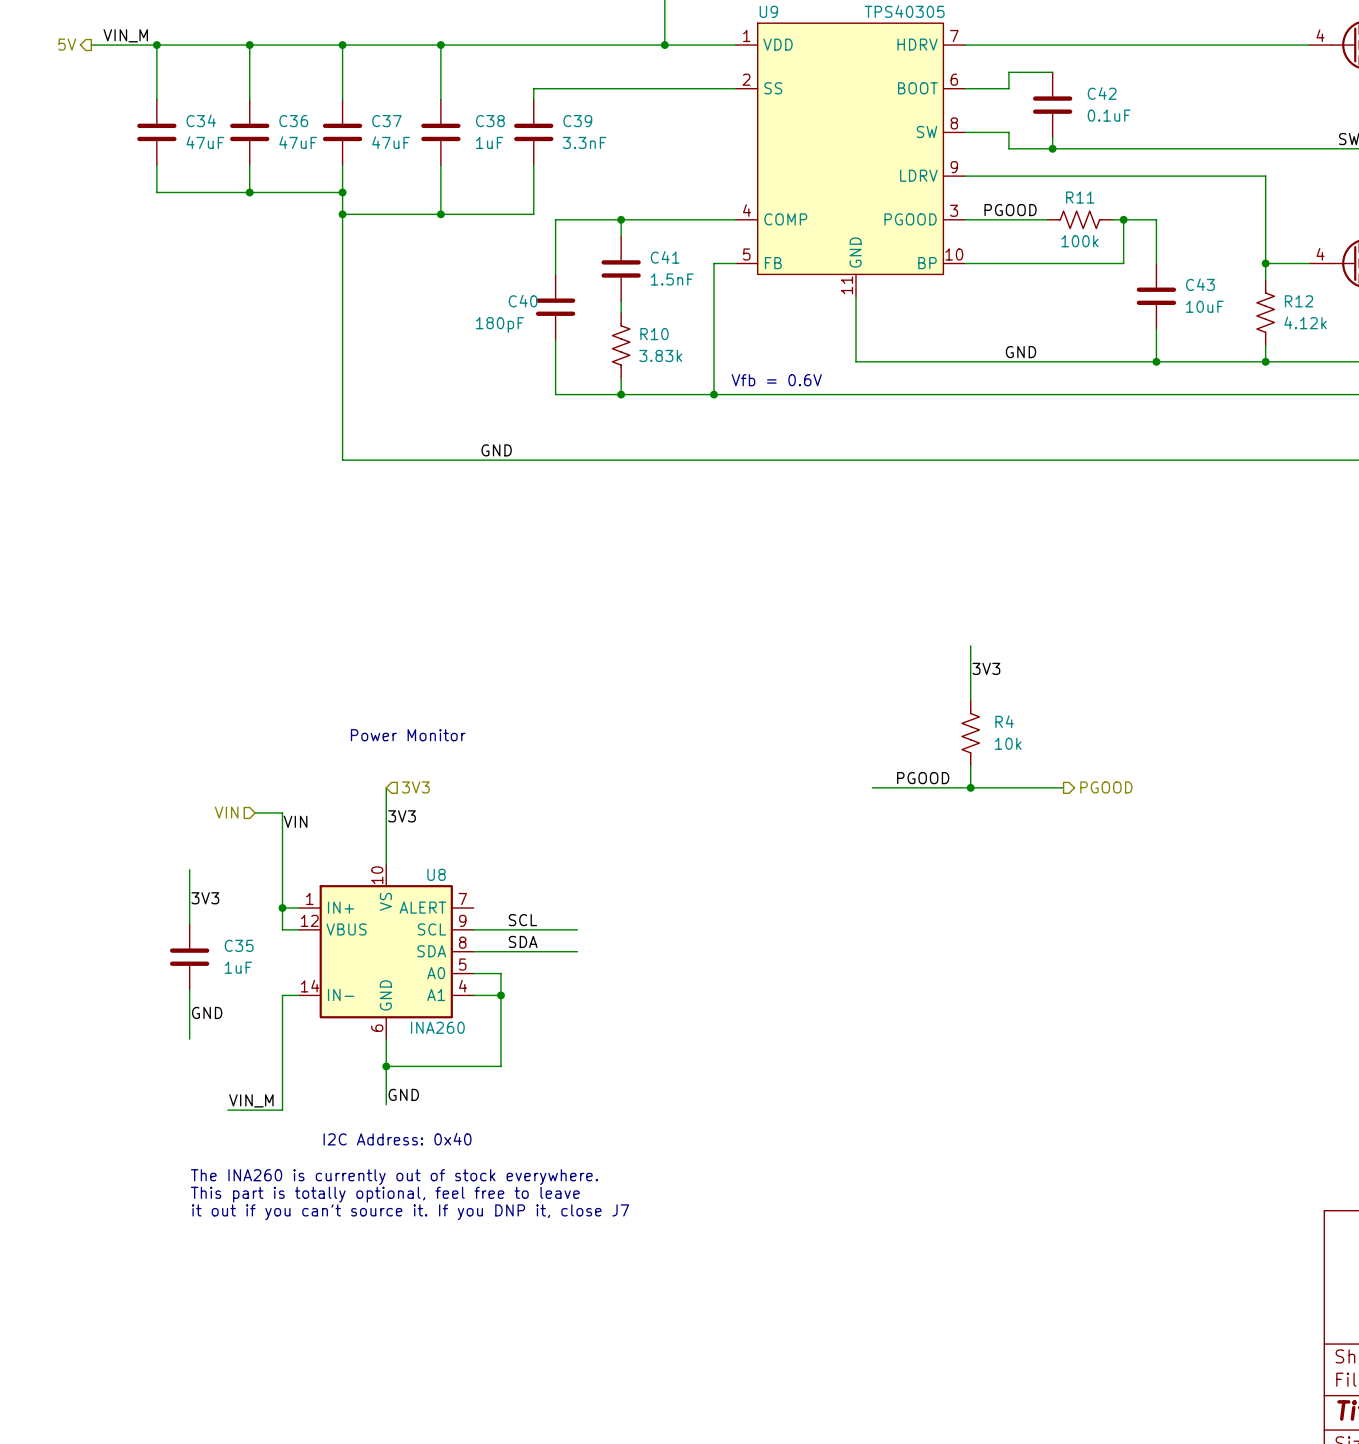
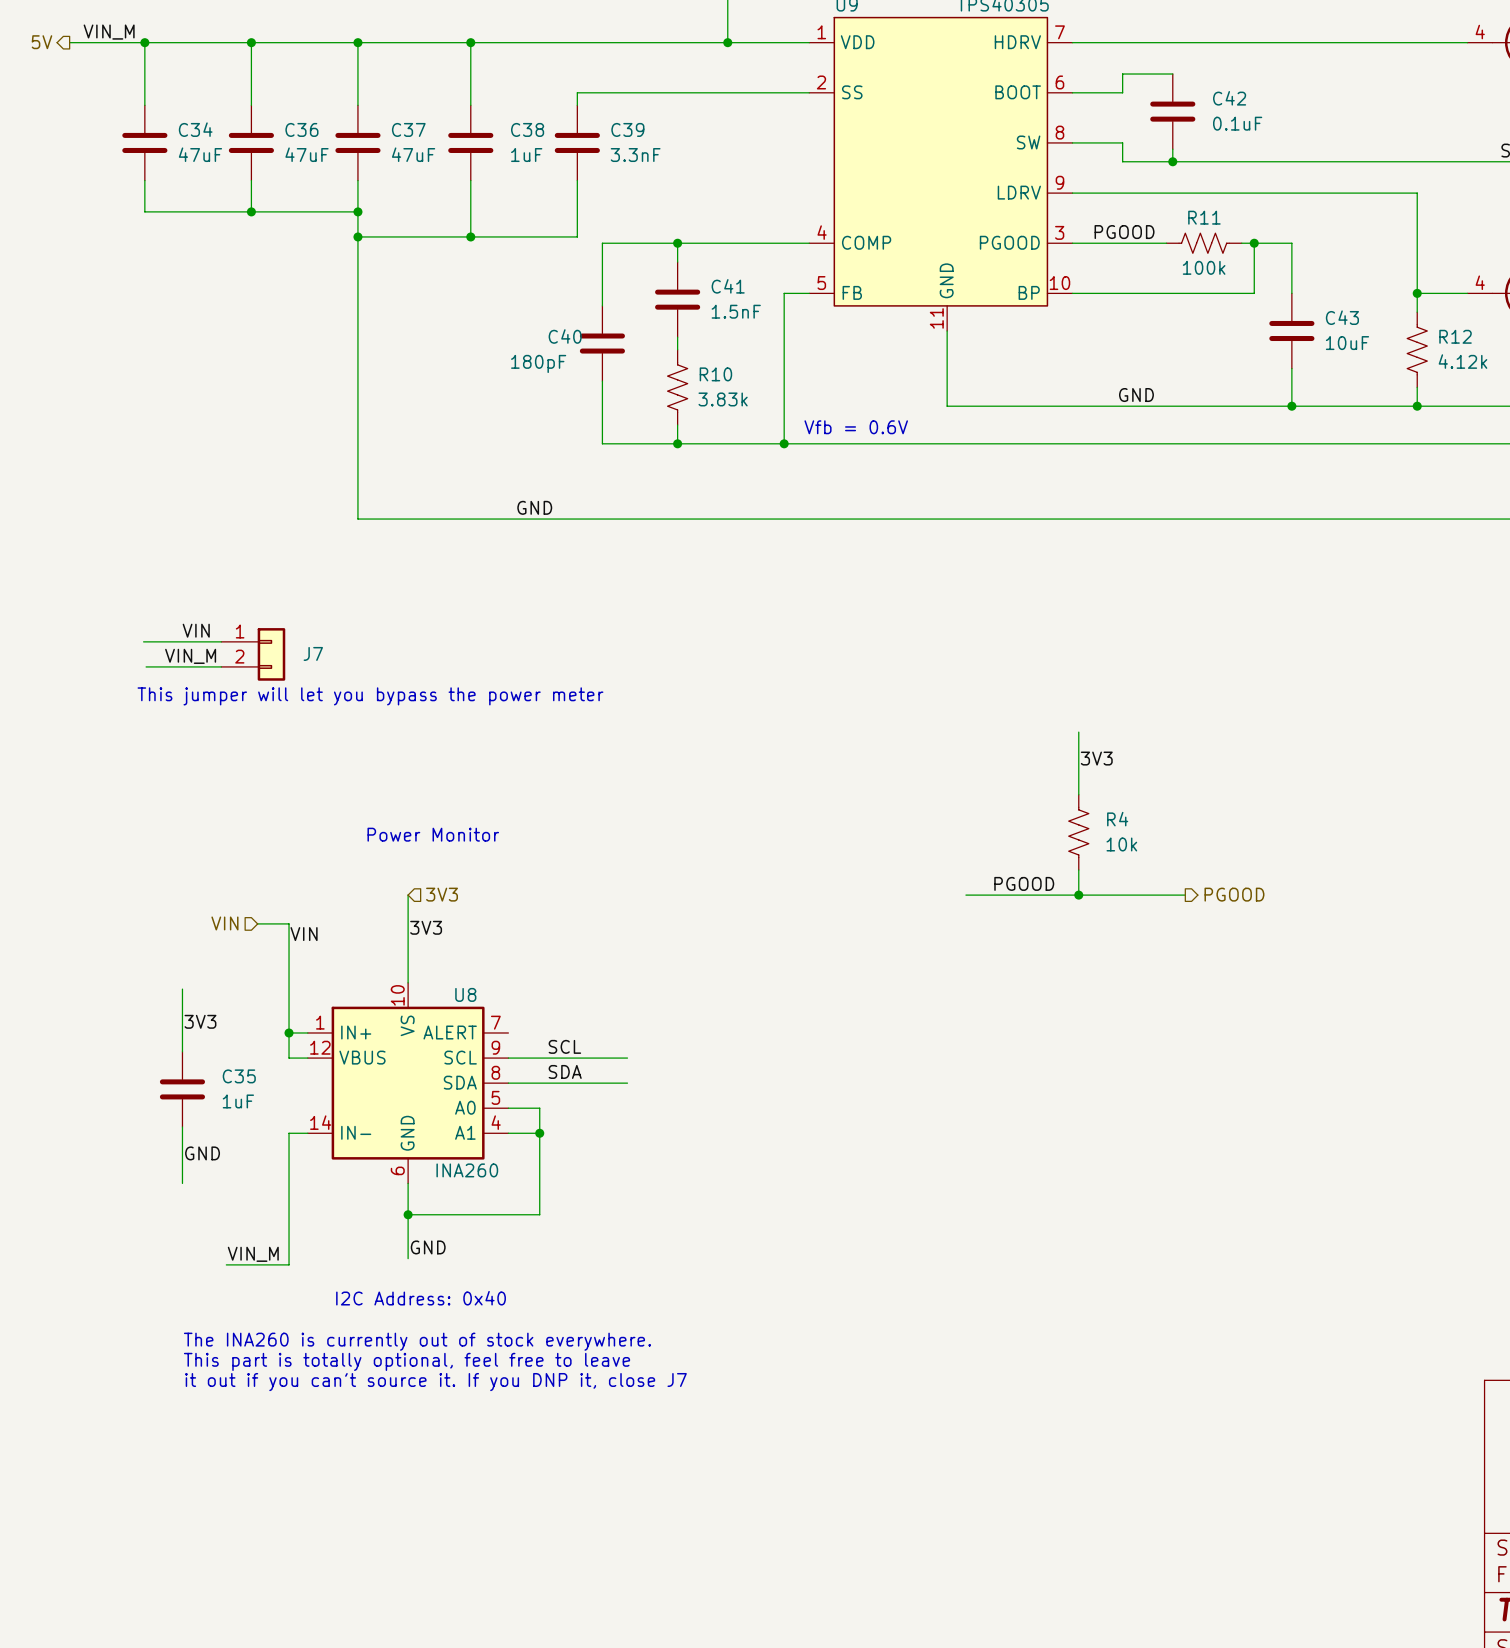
label: none -> VIN (196, 630)
wire: none -> (143, 641) (221, 641)
J7: none -> (253, 654)
label: none -> VIN_M (190, 656)
wire: none -> (146, 666) (221, 666)
text: none -> This jumper will let you bypass the power meter (370, 696)

